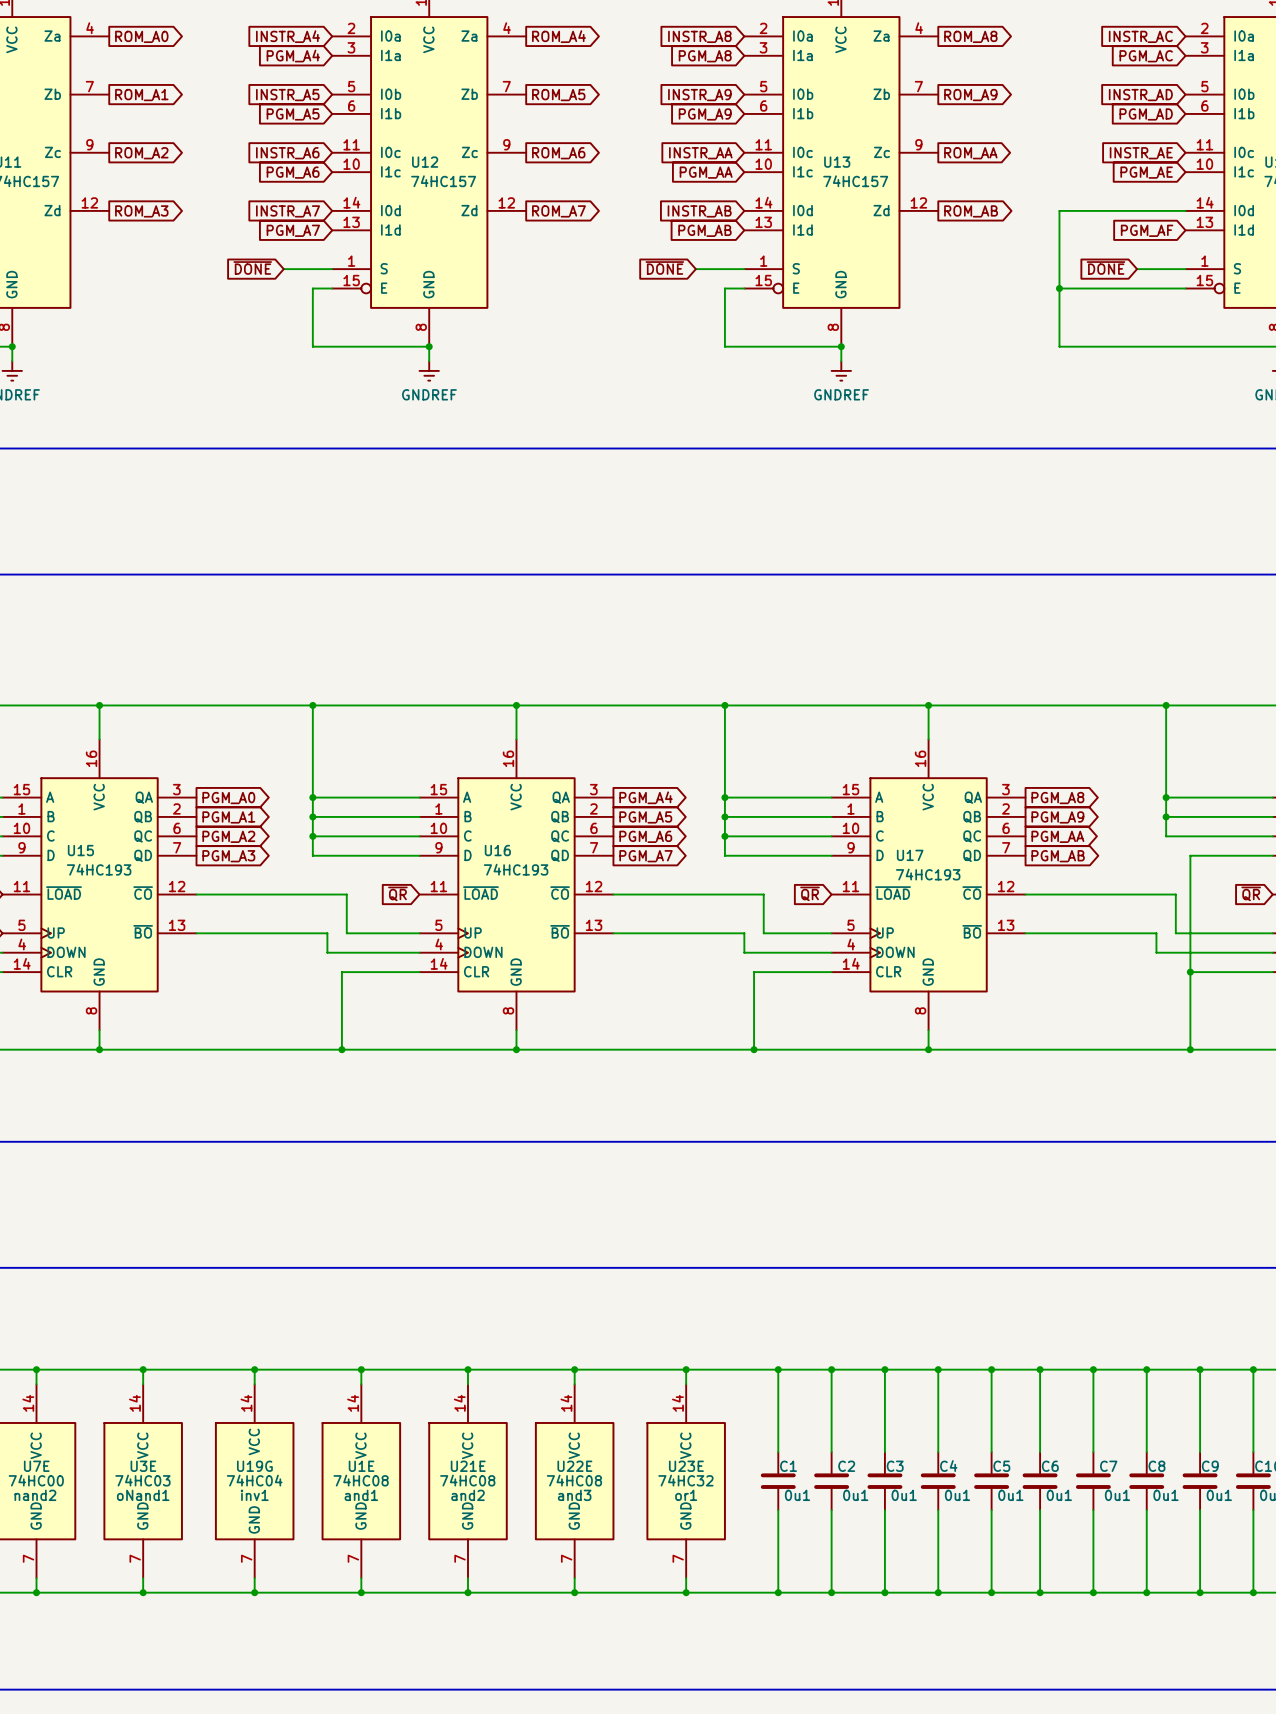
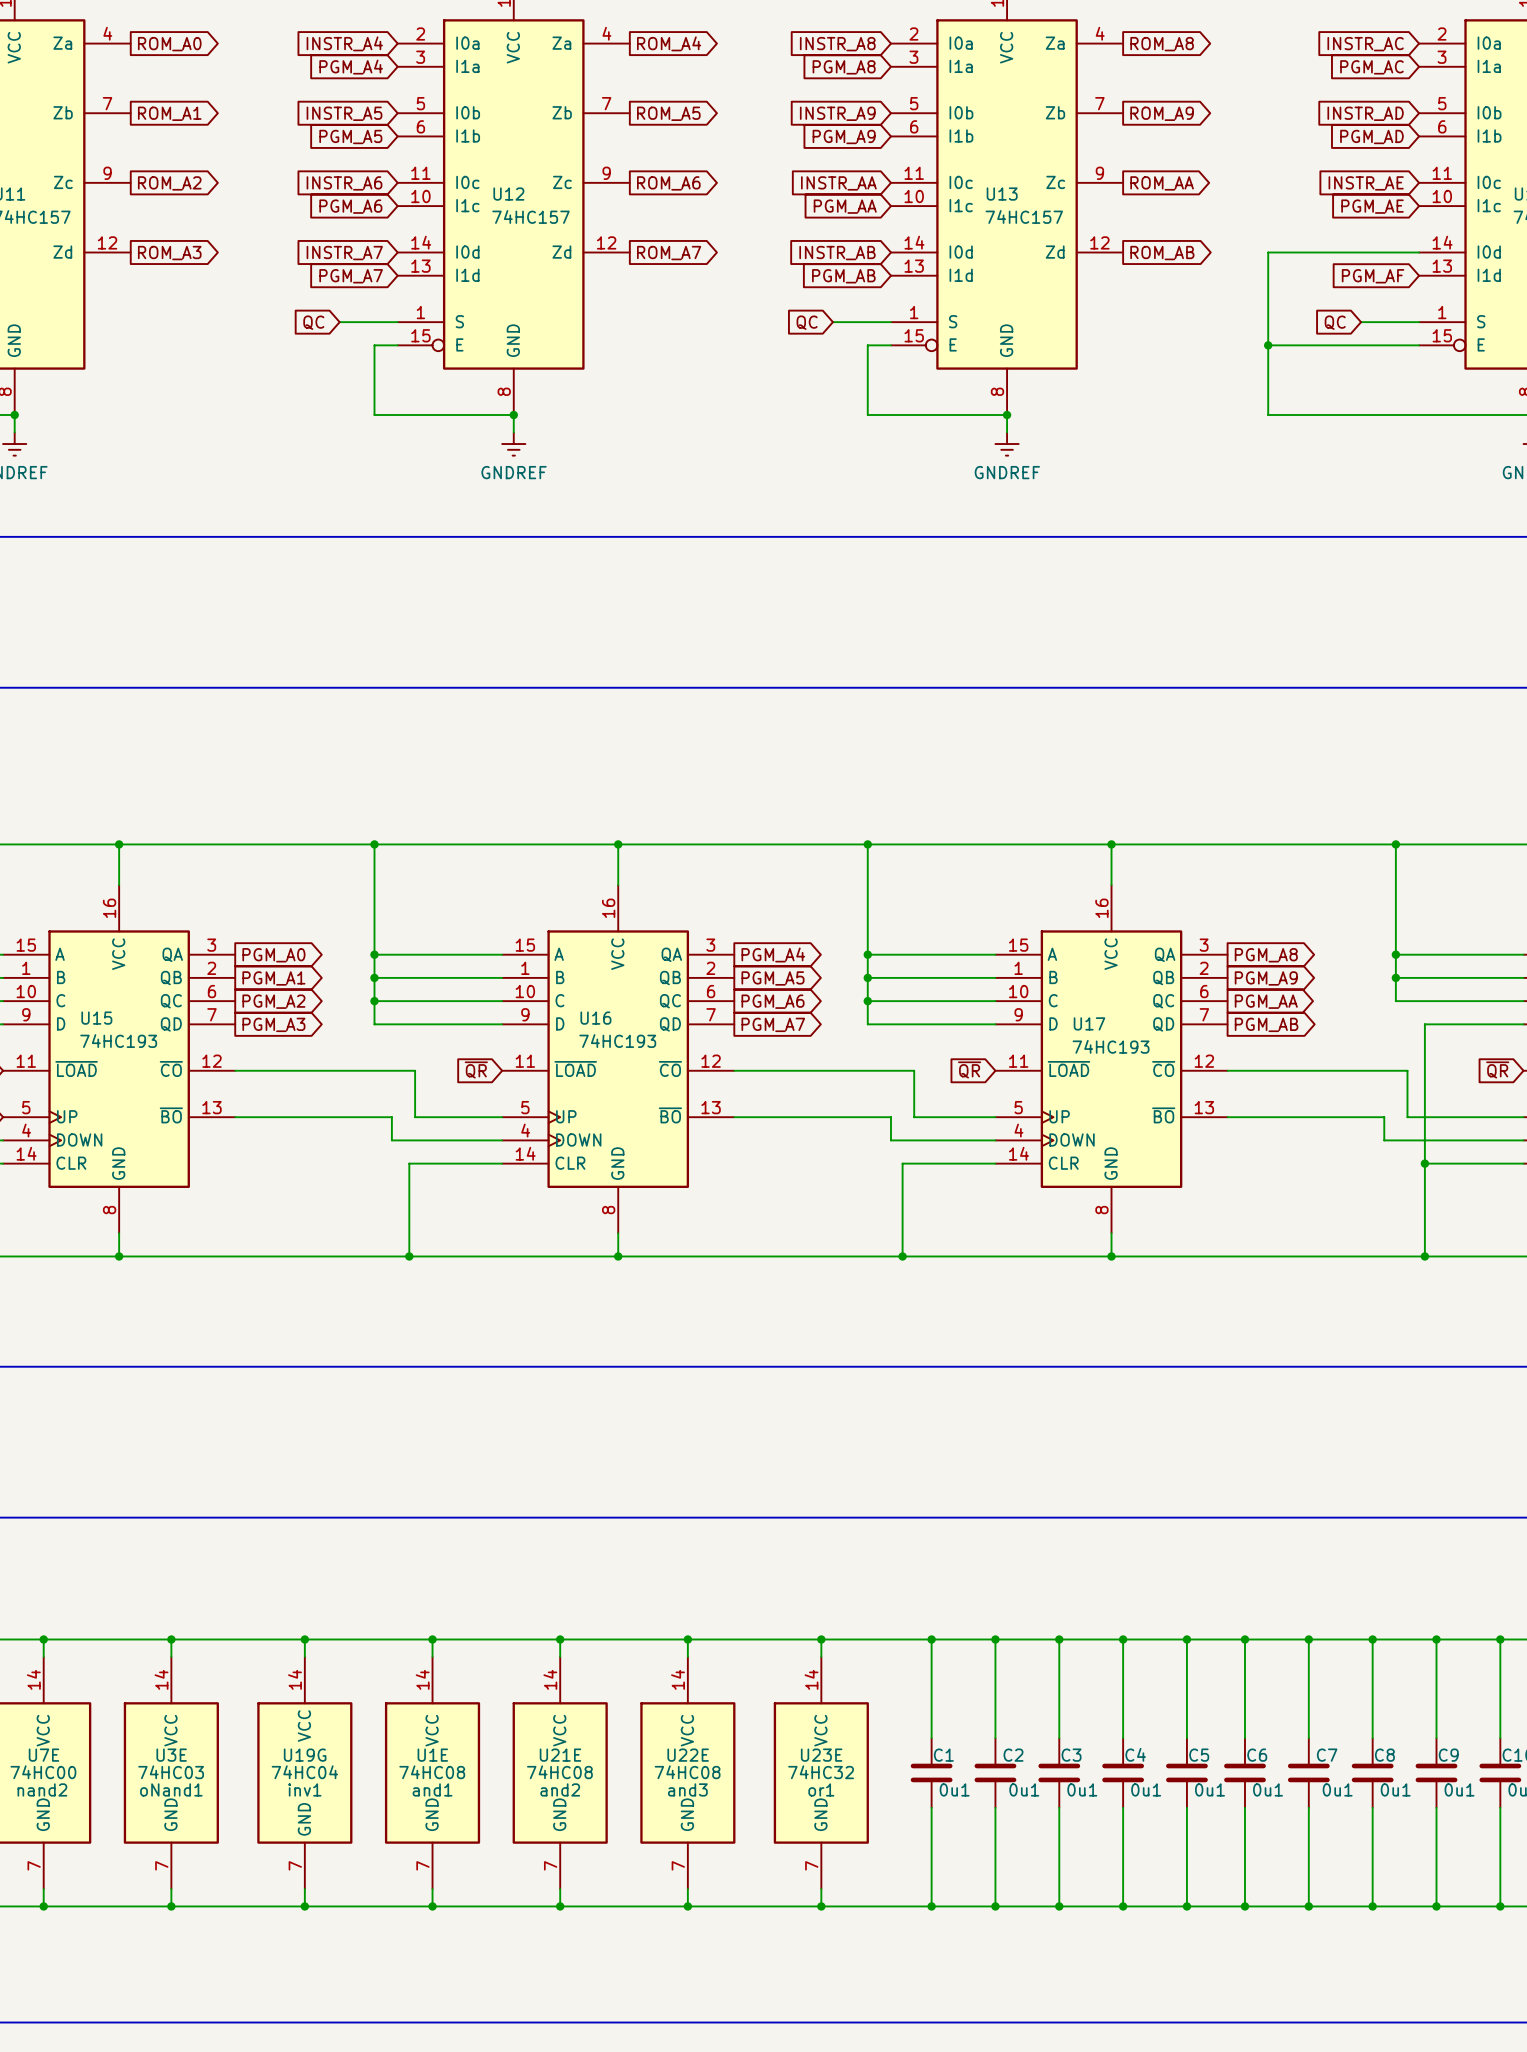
global label: ~{DONE} (252, 268) -> QC (313, 322)
global label: ~{DONE} (664, 268) -> QC (807, 322)
global label: ~{DONE} (1105, 268) -> QC (1335, 322)

